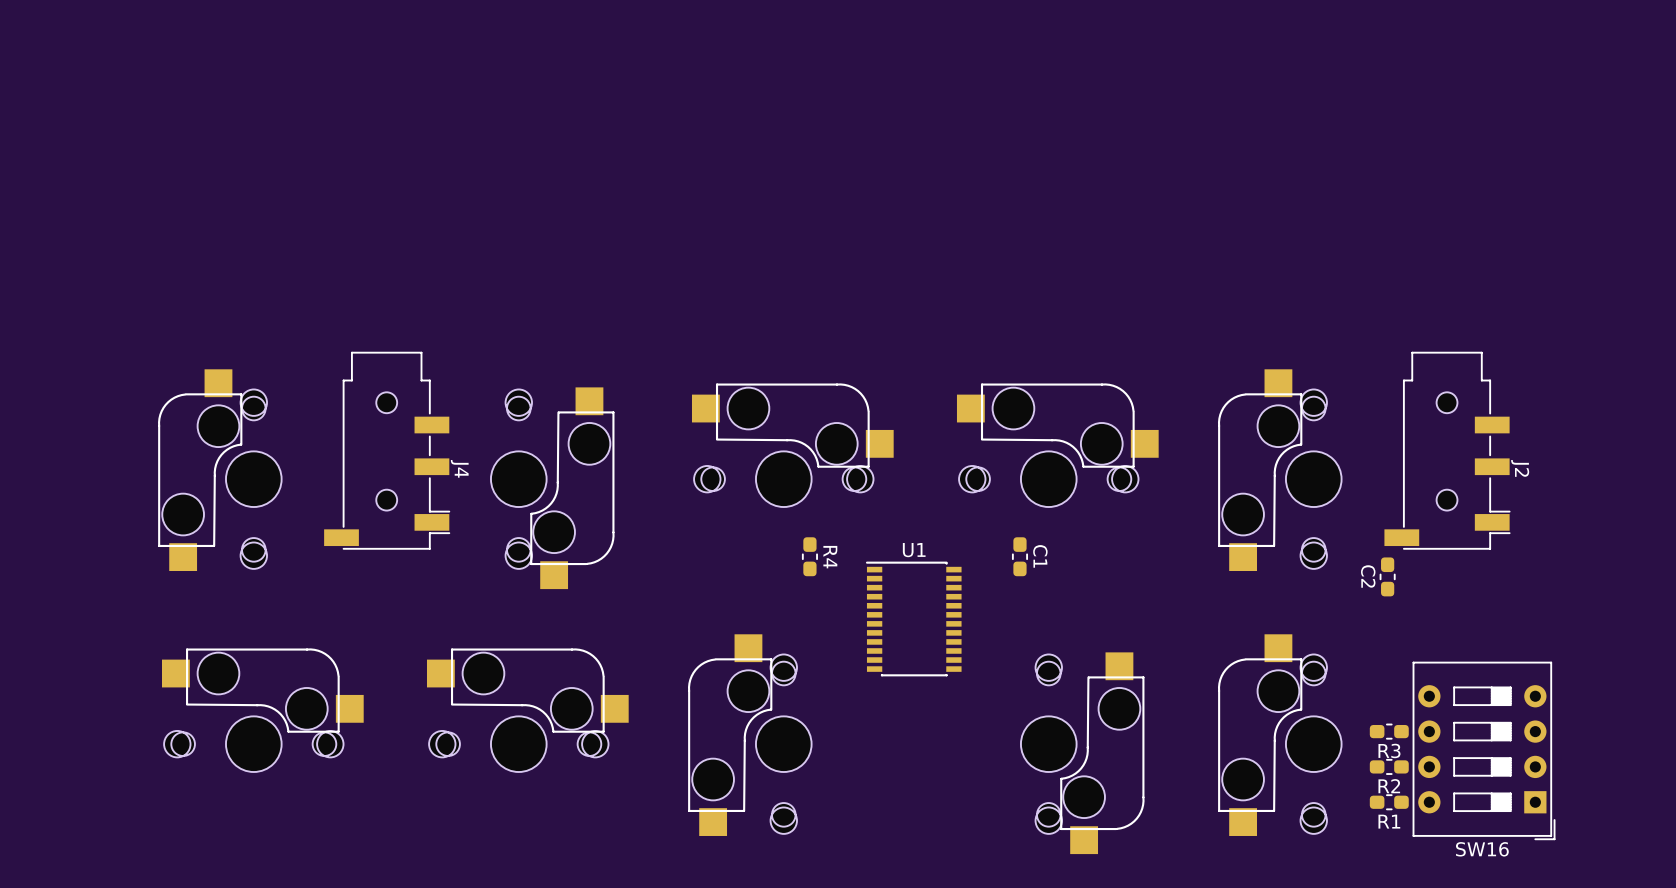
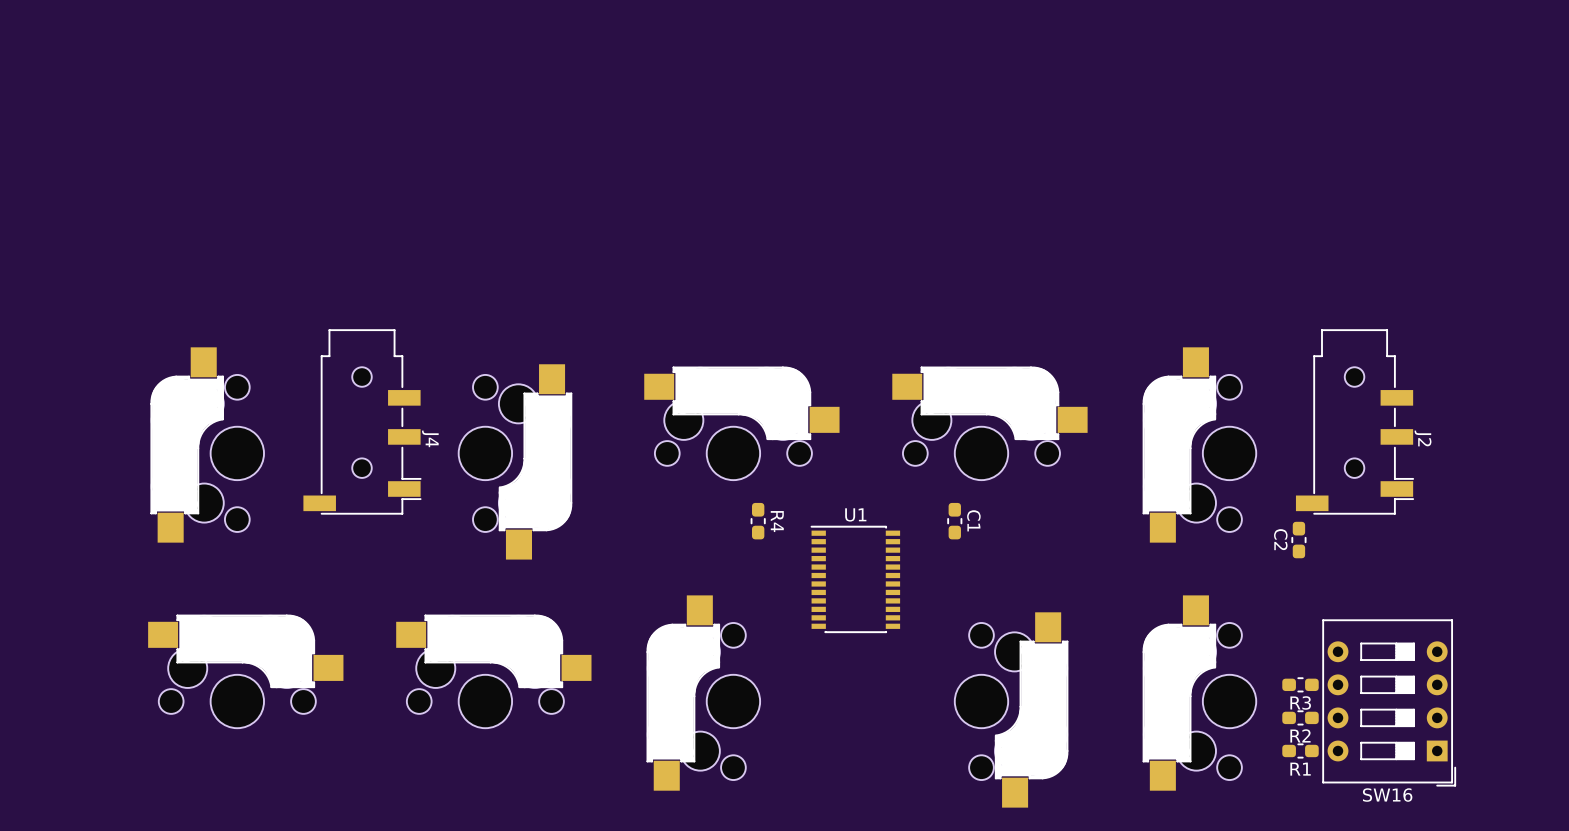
part footprint: [158, 369, 282, 572] -> [150, 347, 265, 543]
part footprint: [1217, 369, 1342, 572] -> [1142, 347, 1257, 543]
part footprint: [691, 383, 894, 508] -> [644, 366, 840, 481]
part footprint: [956, 383, 1159, 508] -> [892, 366, 1088, 481]
part footprint: [490, 387, 615, 590] -> [458, 364, 573, 560]
part footprint: [687, 634, 812, 836] -> [646, 595, 761, 791]
part footprint: [1217, 634, 1342, 836] -> [1142, 595, 1257, 791]
part footprint: [161, 648, 364, 773] -> [148, 614, 344, 729]
part footprint: [426, 648, 629, 773] -> [396, 614, 592, 729]
part footprint: [1020, 652, 1145, 855] -> [954, 612, 1069, 808]

